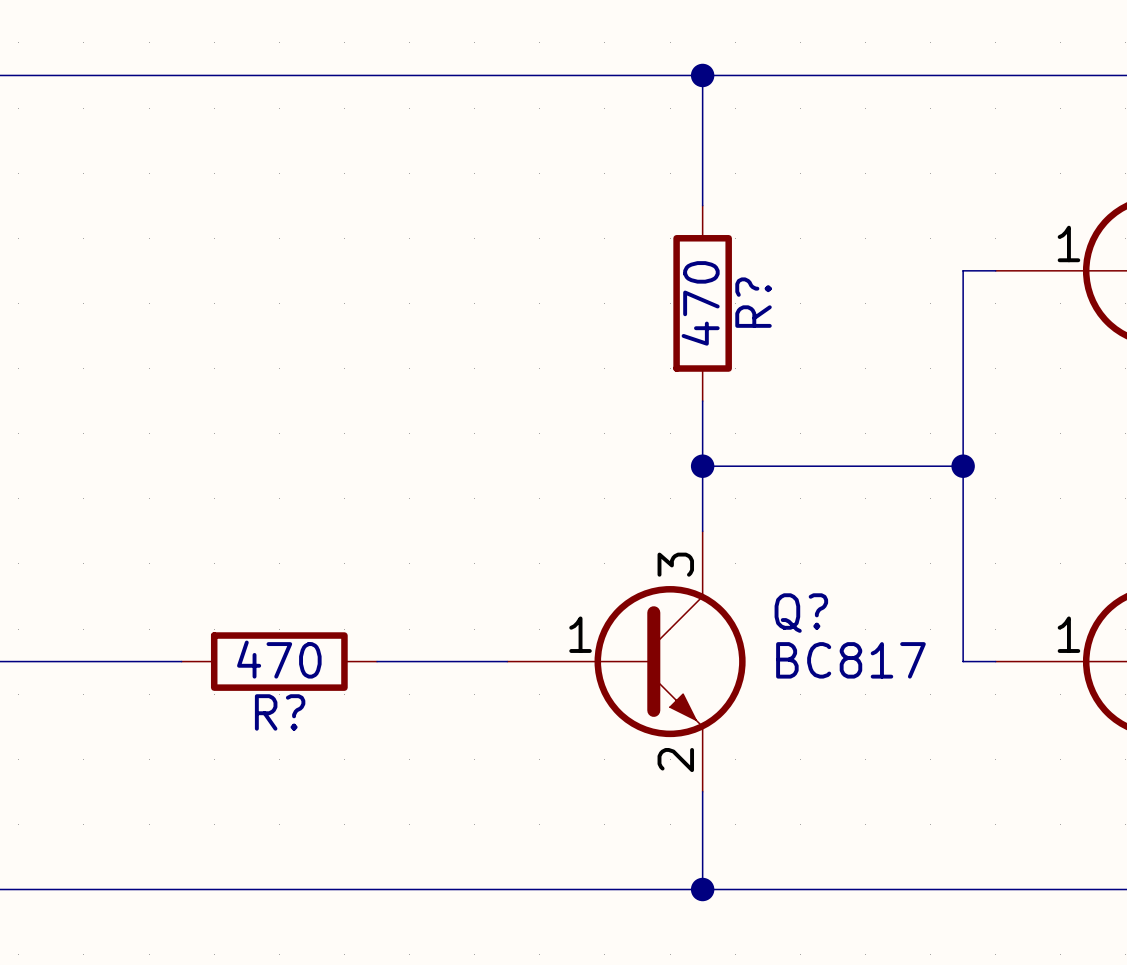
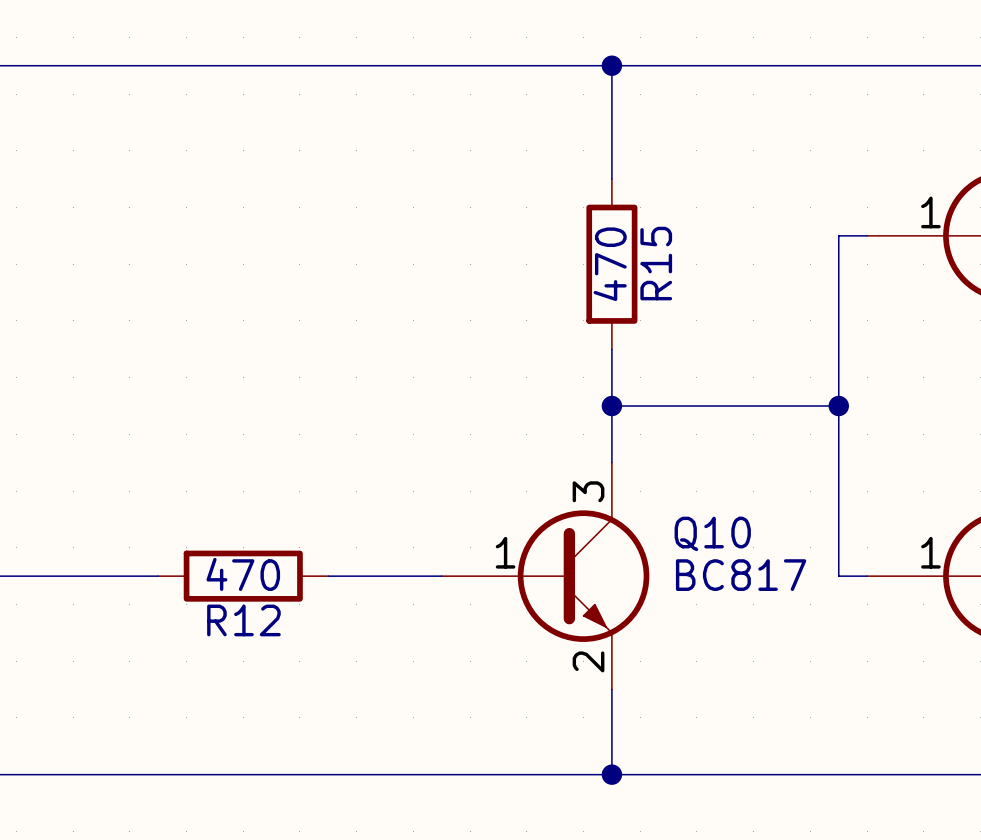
R? name: R? (753, 302) -> R15 (656, 263)
Q? name: Q? (801, 613) -> Q10 (712, 533)
R? name: R? (280, 712) -> R12 (243, 620)

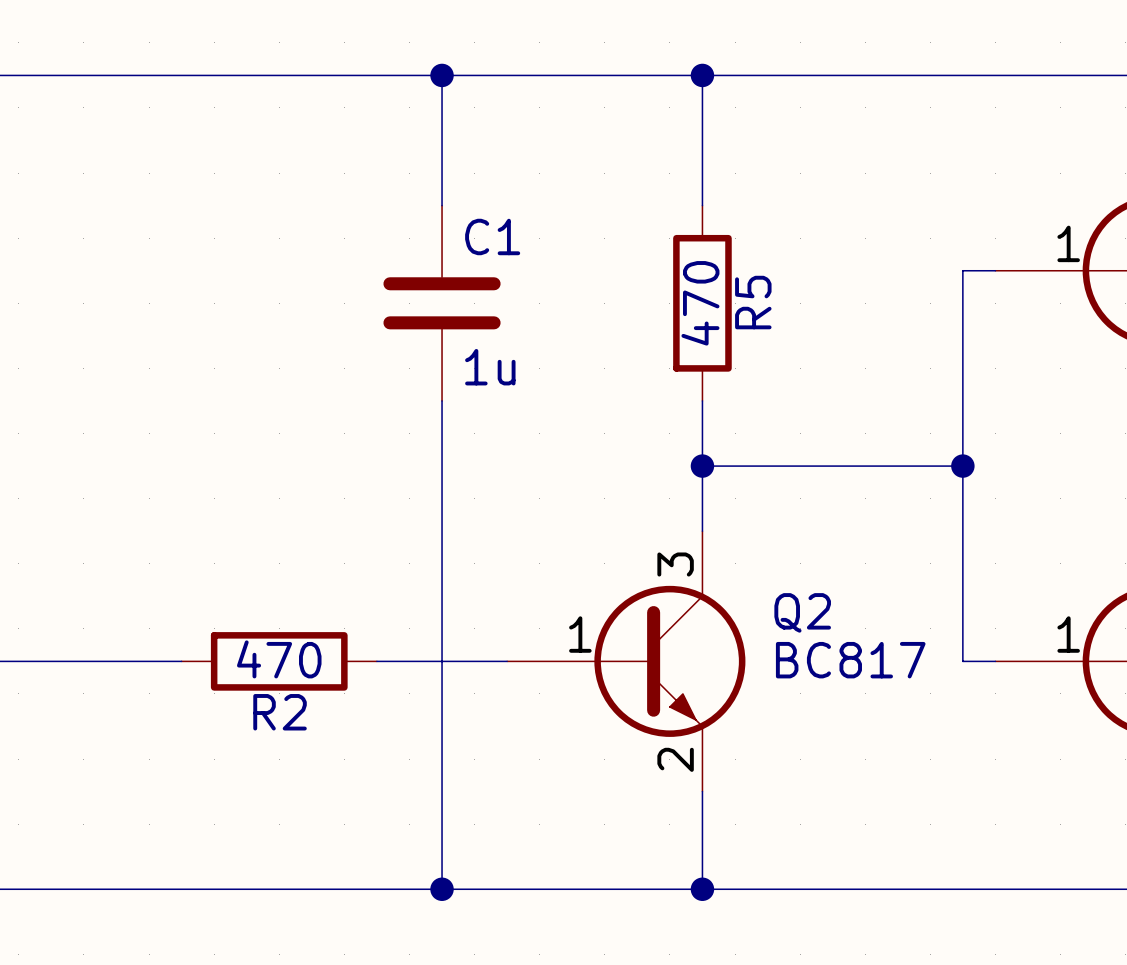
wire: none -> (442, 75) (442, 205)
junction: none -> (442, 75)
R15 name: R15 (656, 263) -> R5 (753, 302)
C1: none -> 1u (442, 303)
wire: none -> (442, 400) (442, 889)
Q10 name: Q10 (712, 533) -> Q2 (802, 612)
R12 name: R12 (243, 620) -> R2 (280, 712)
junction: none -> (442, 889)

